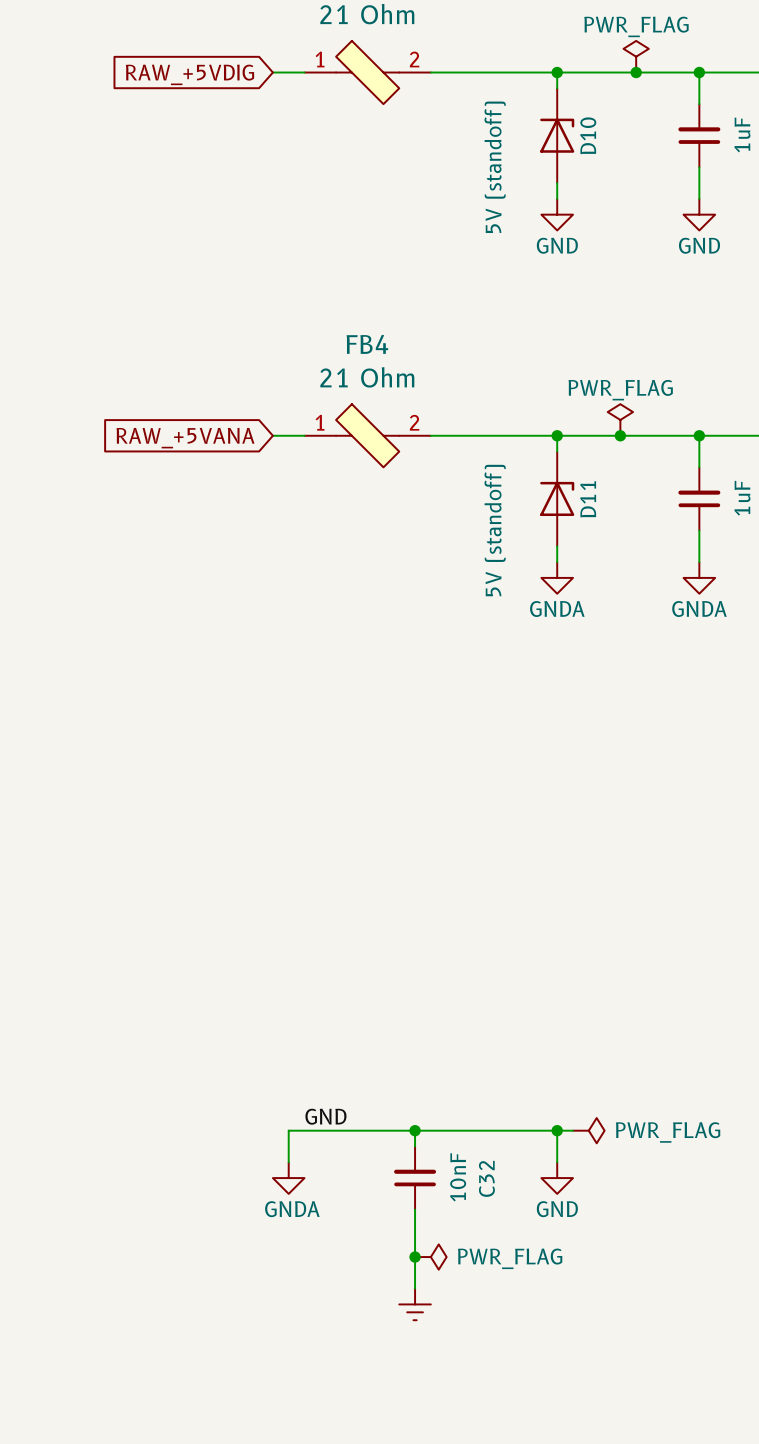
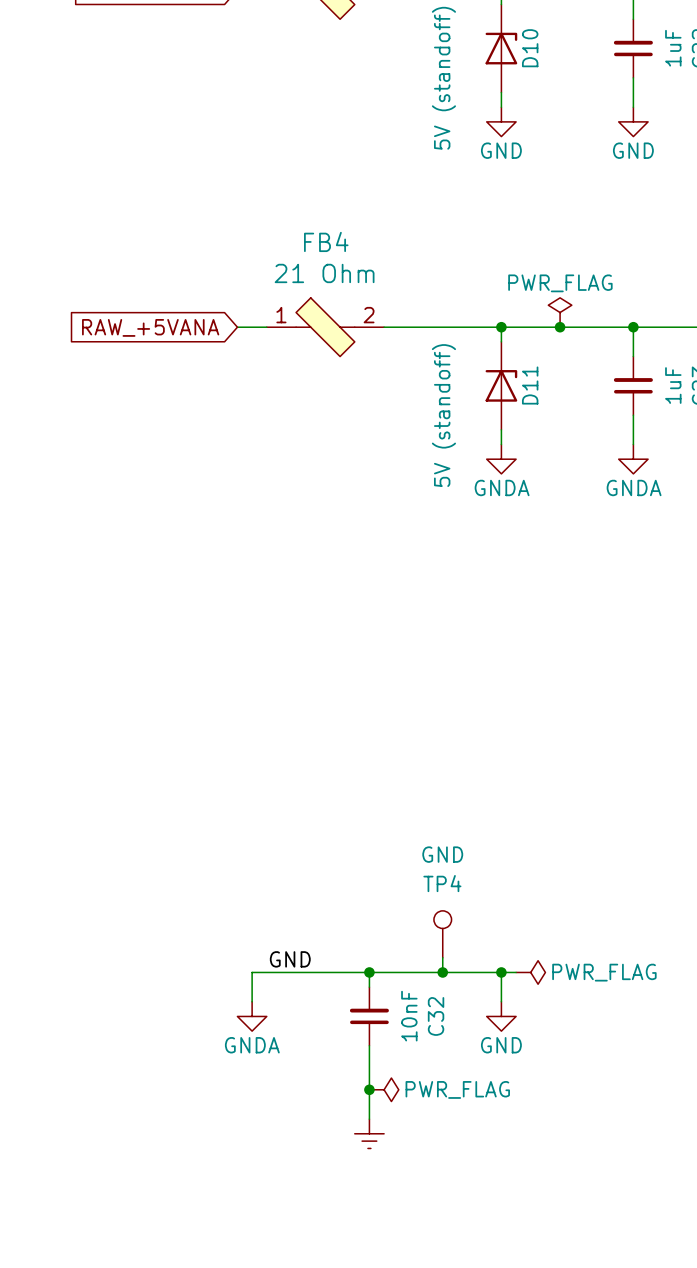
TP4: none -> GND (442, 934)
wire: none -> (442, 957) (442, 972)
junction: none -> (442, 972)

